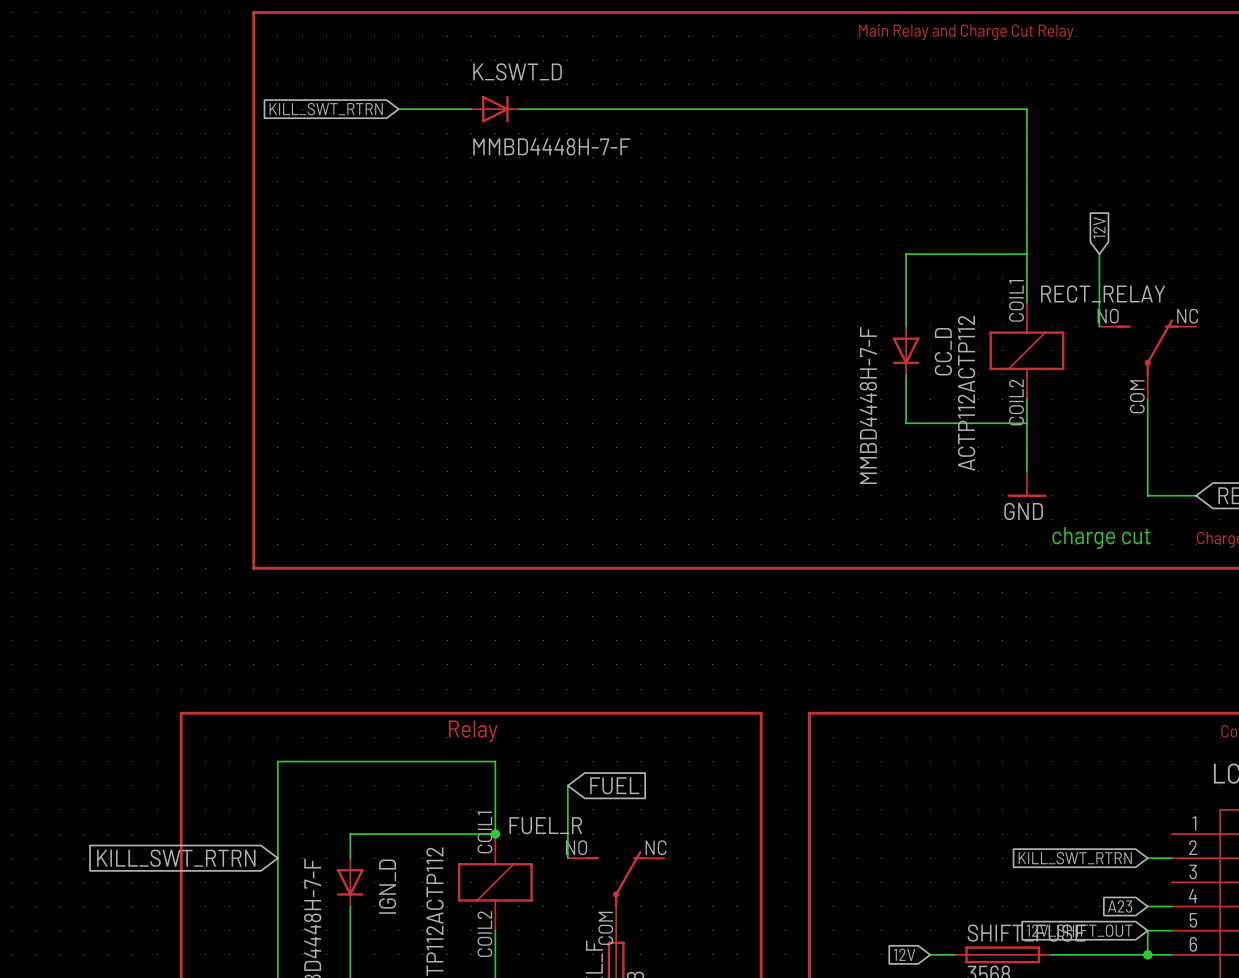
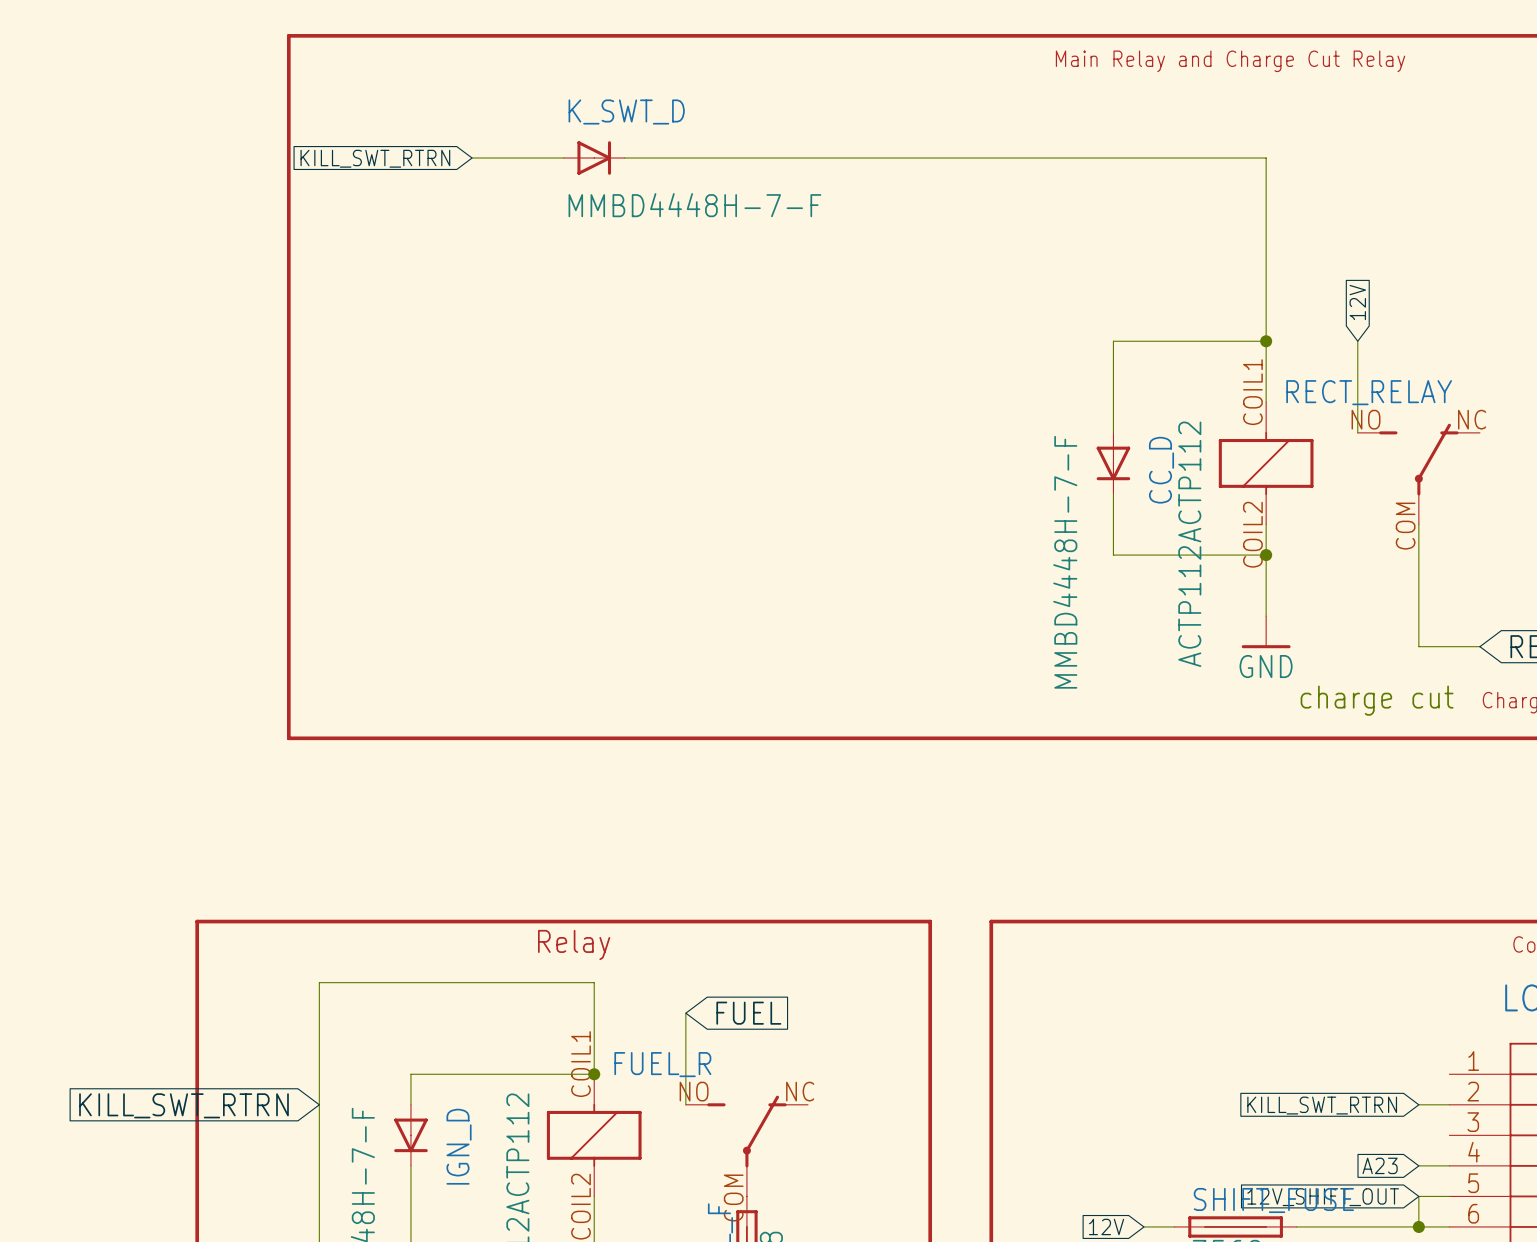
junction: none -> (1266, 341)
junction: none -> (1266, 555)

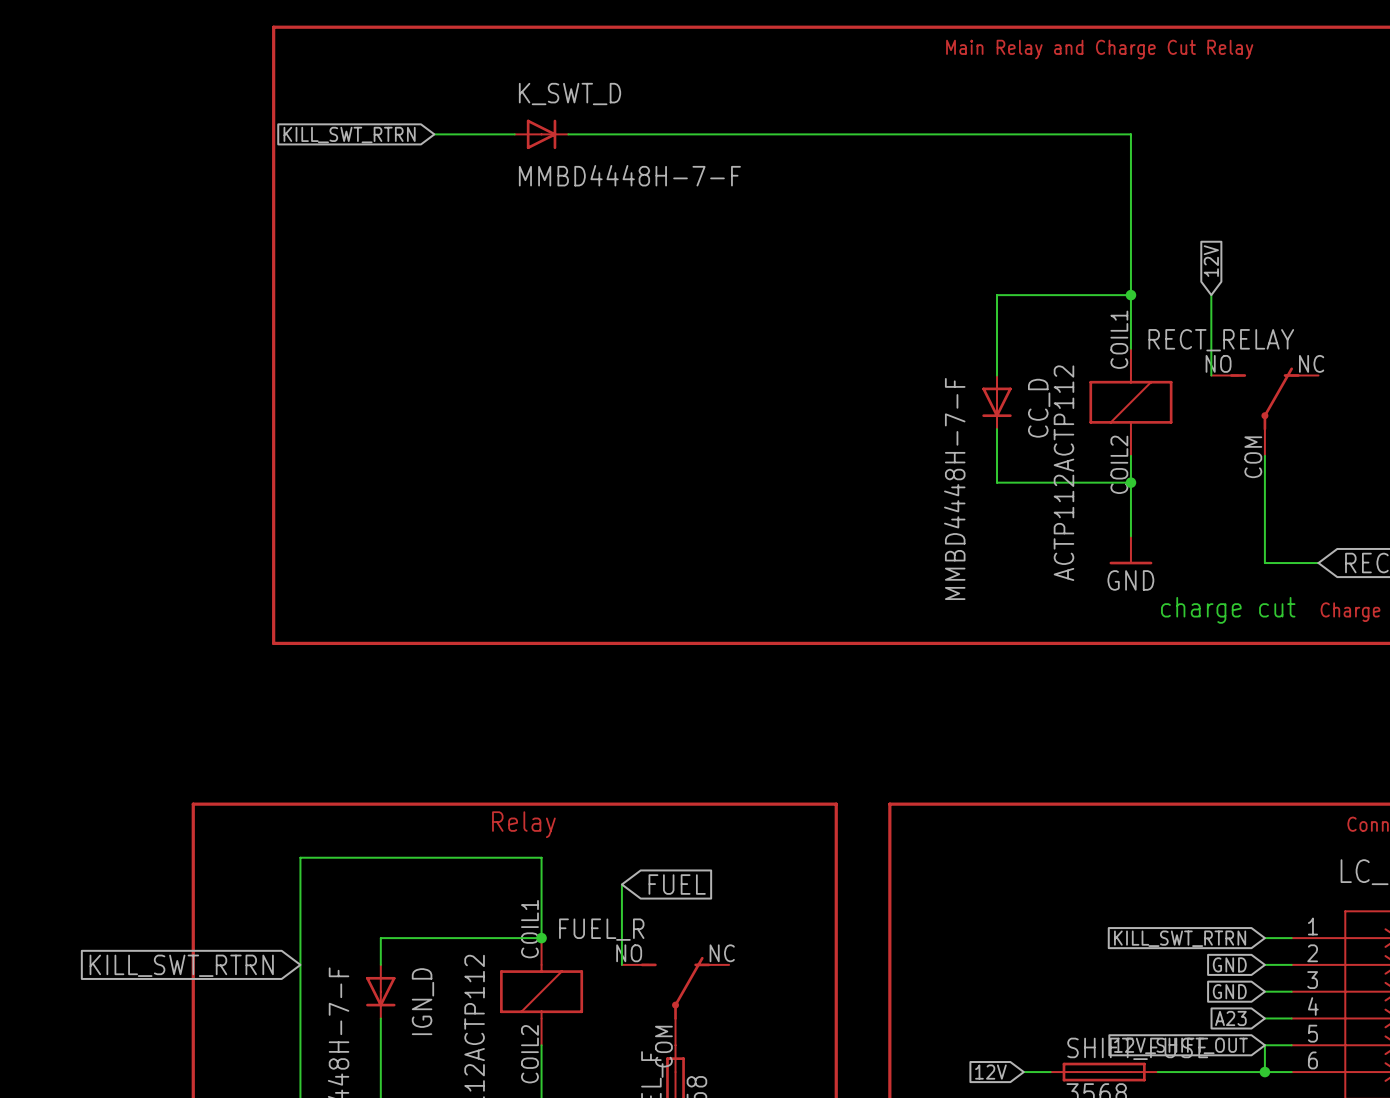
global label: none -> KILL_SWT_RTRN (1180, 938)
wire: none -> (1264, 938) (1291, 938)
global label: KILL_SWT_RTRN (1322, 1105) -> GND (1229, 964)
global label: none -> GND (1229, 991)
wire: none -> (1264, 991) (1291, 991)

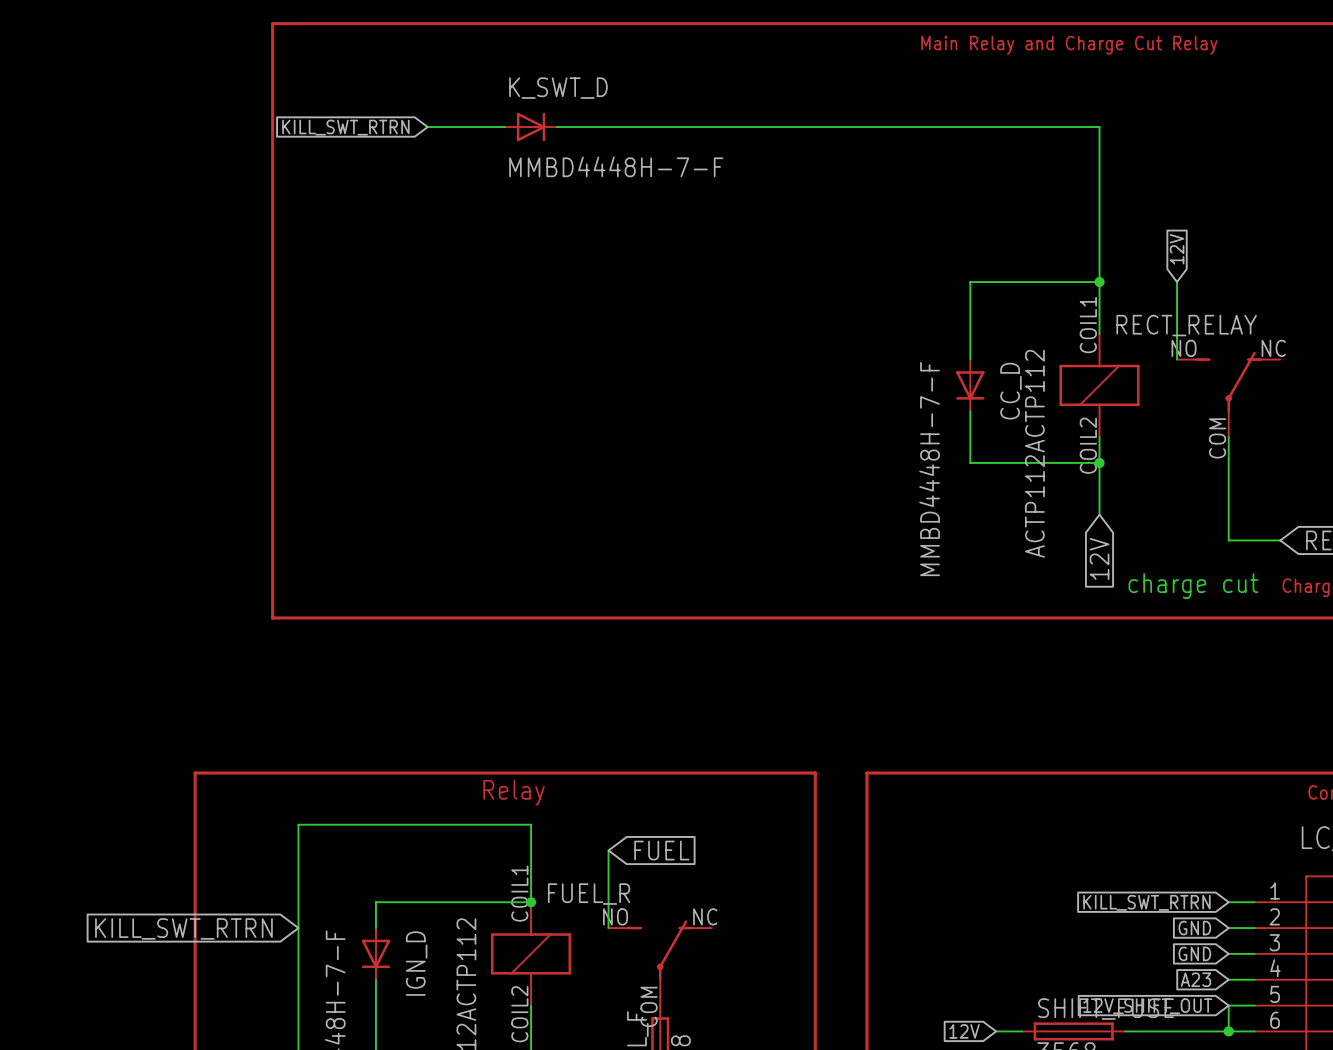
power symbol: GND (1130, 550) -> none
global label: none -> 12V (1099, 558)

